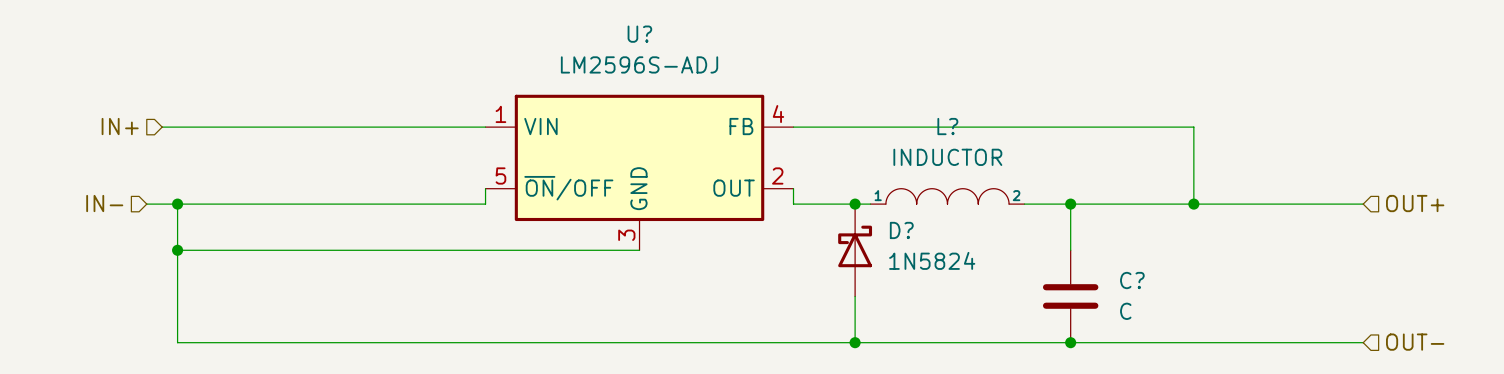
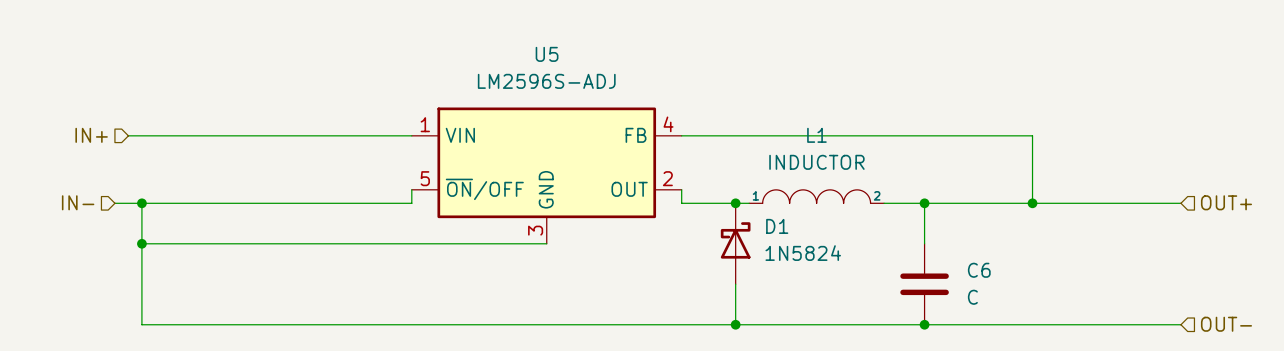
U? name: U? (639, 34) -> U5 (547, 54)
L?: INDUCTOR (947, 196) -> none
L1: none -> INDUCTOR (816, 196)
D? name: D? (901, 230) -> D1 (777, 226)
C? name: C? (1132, 280) -> C6 (979, 270)

